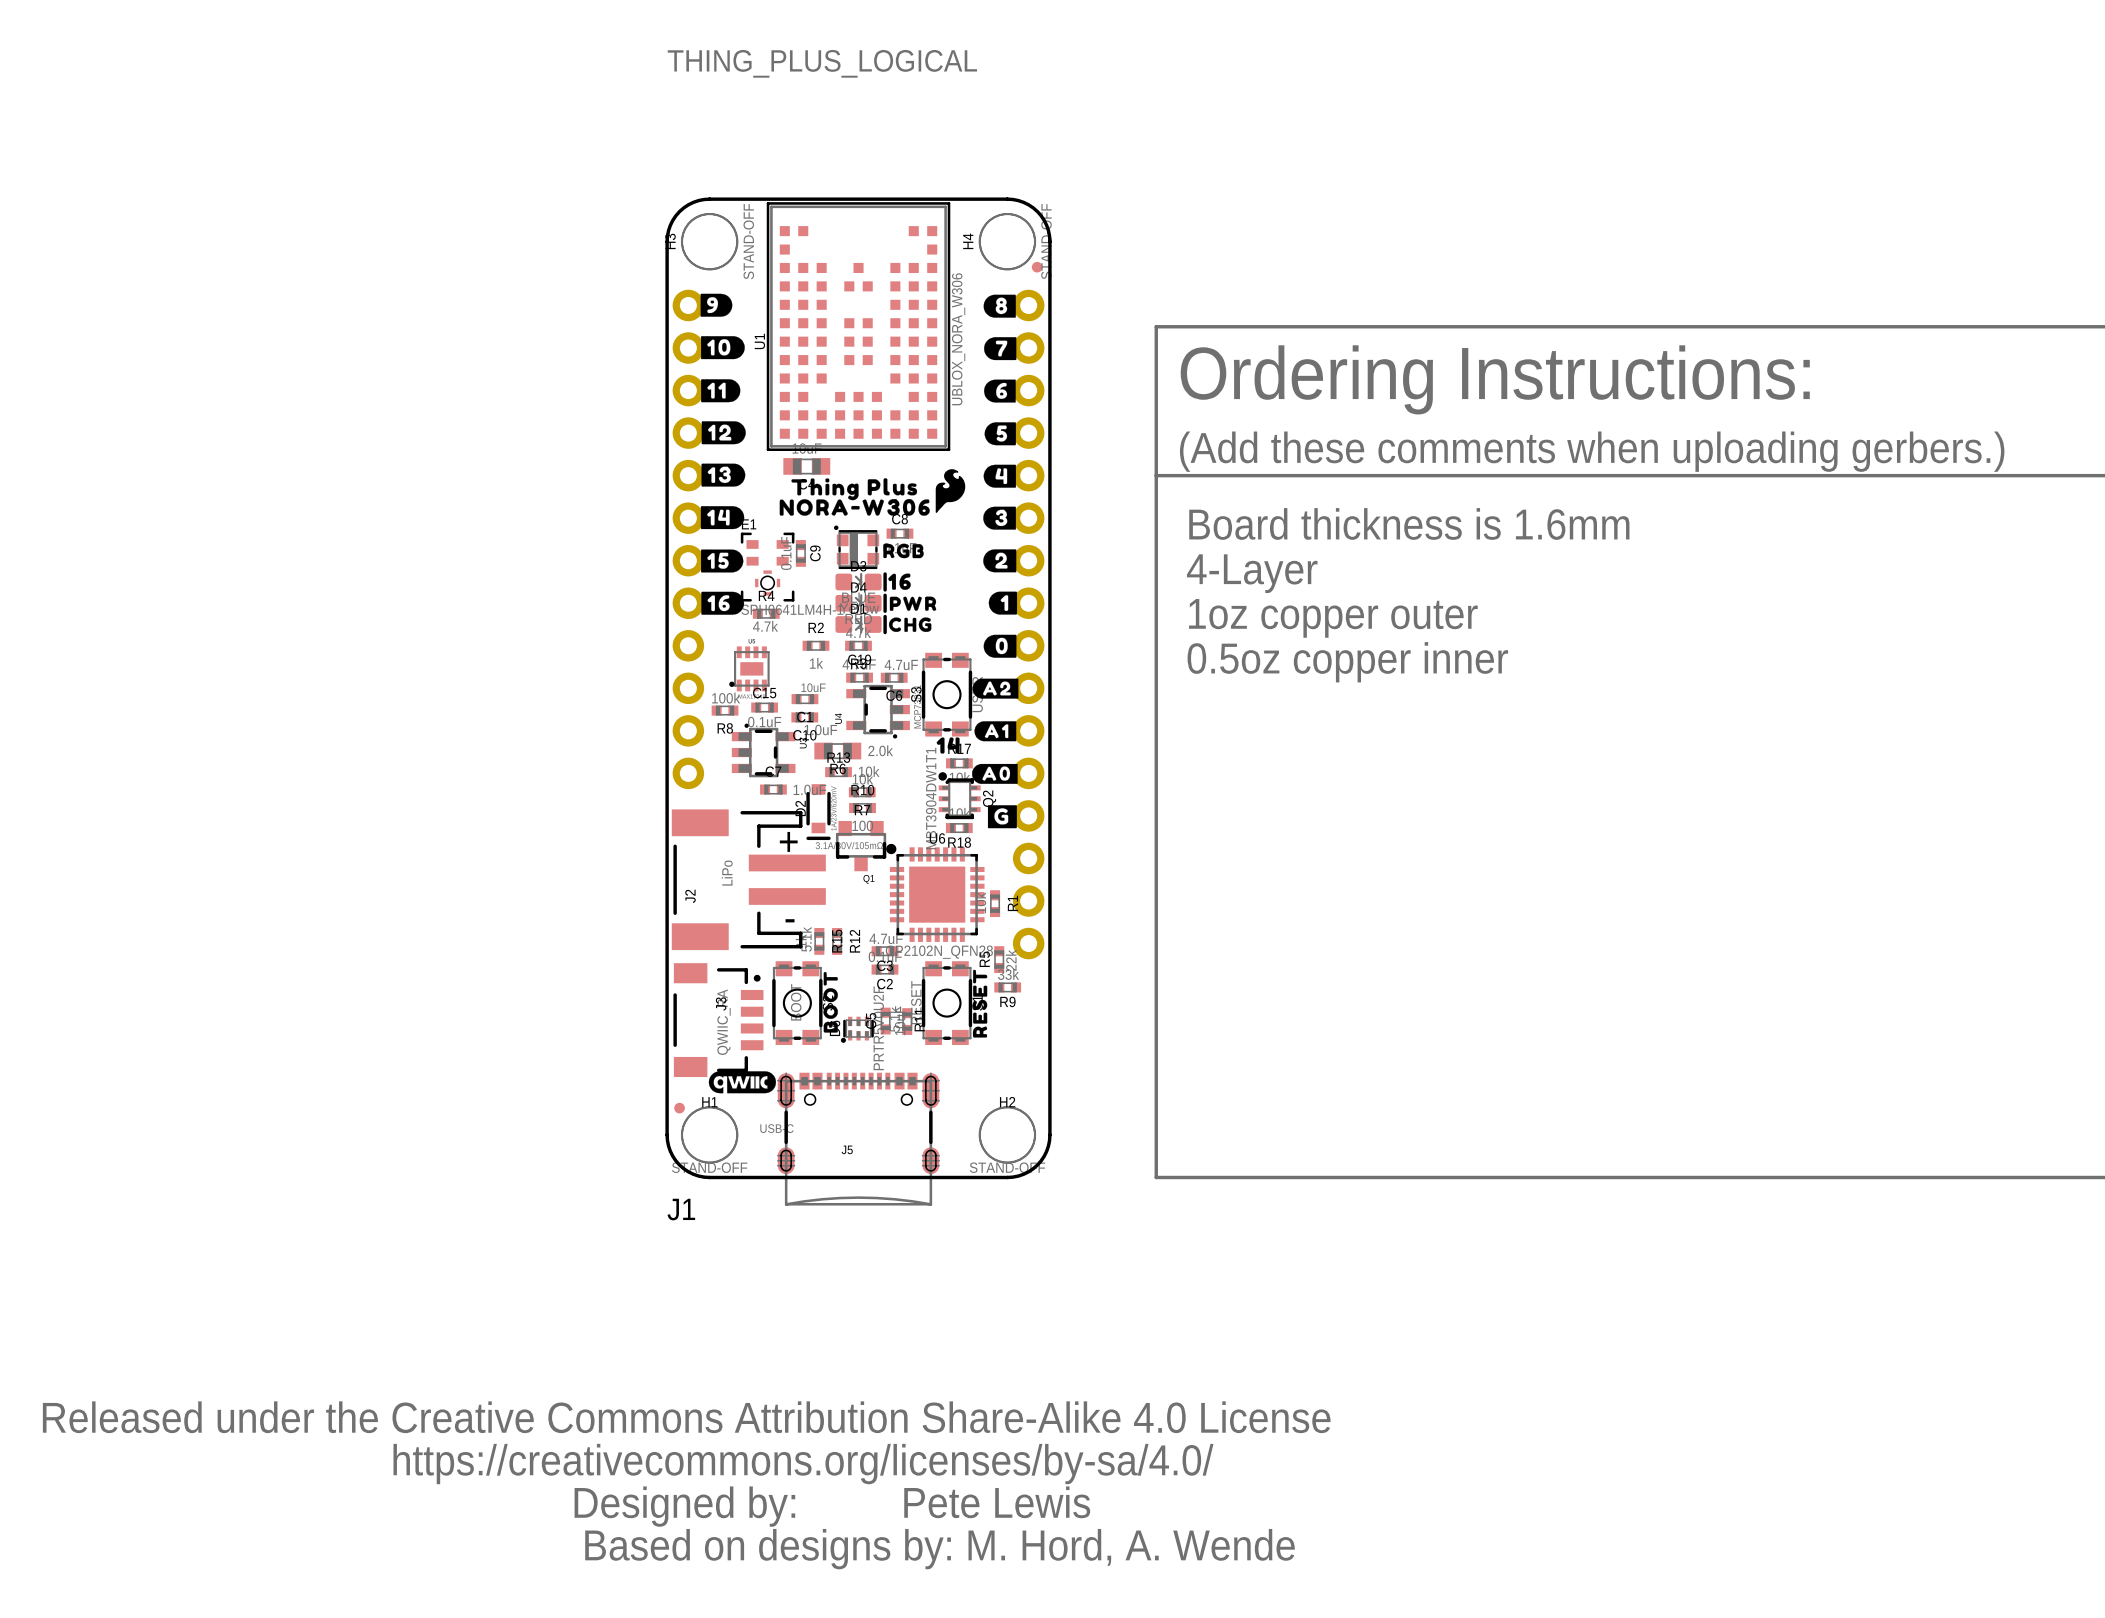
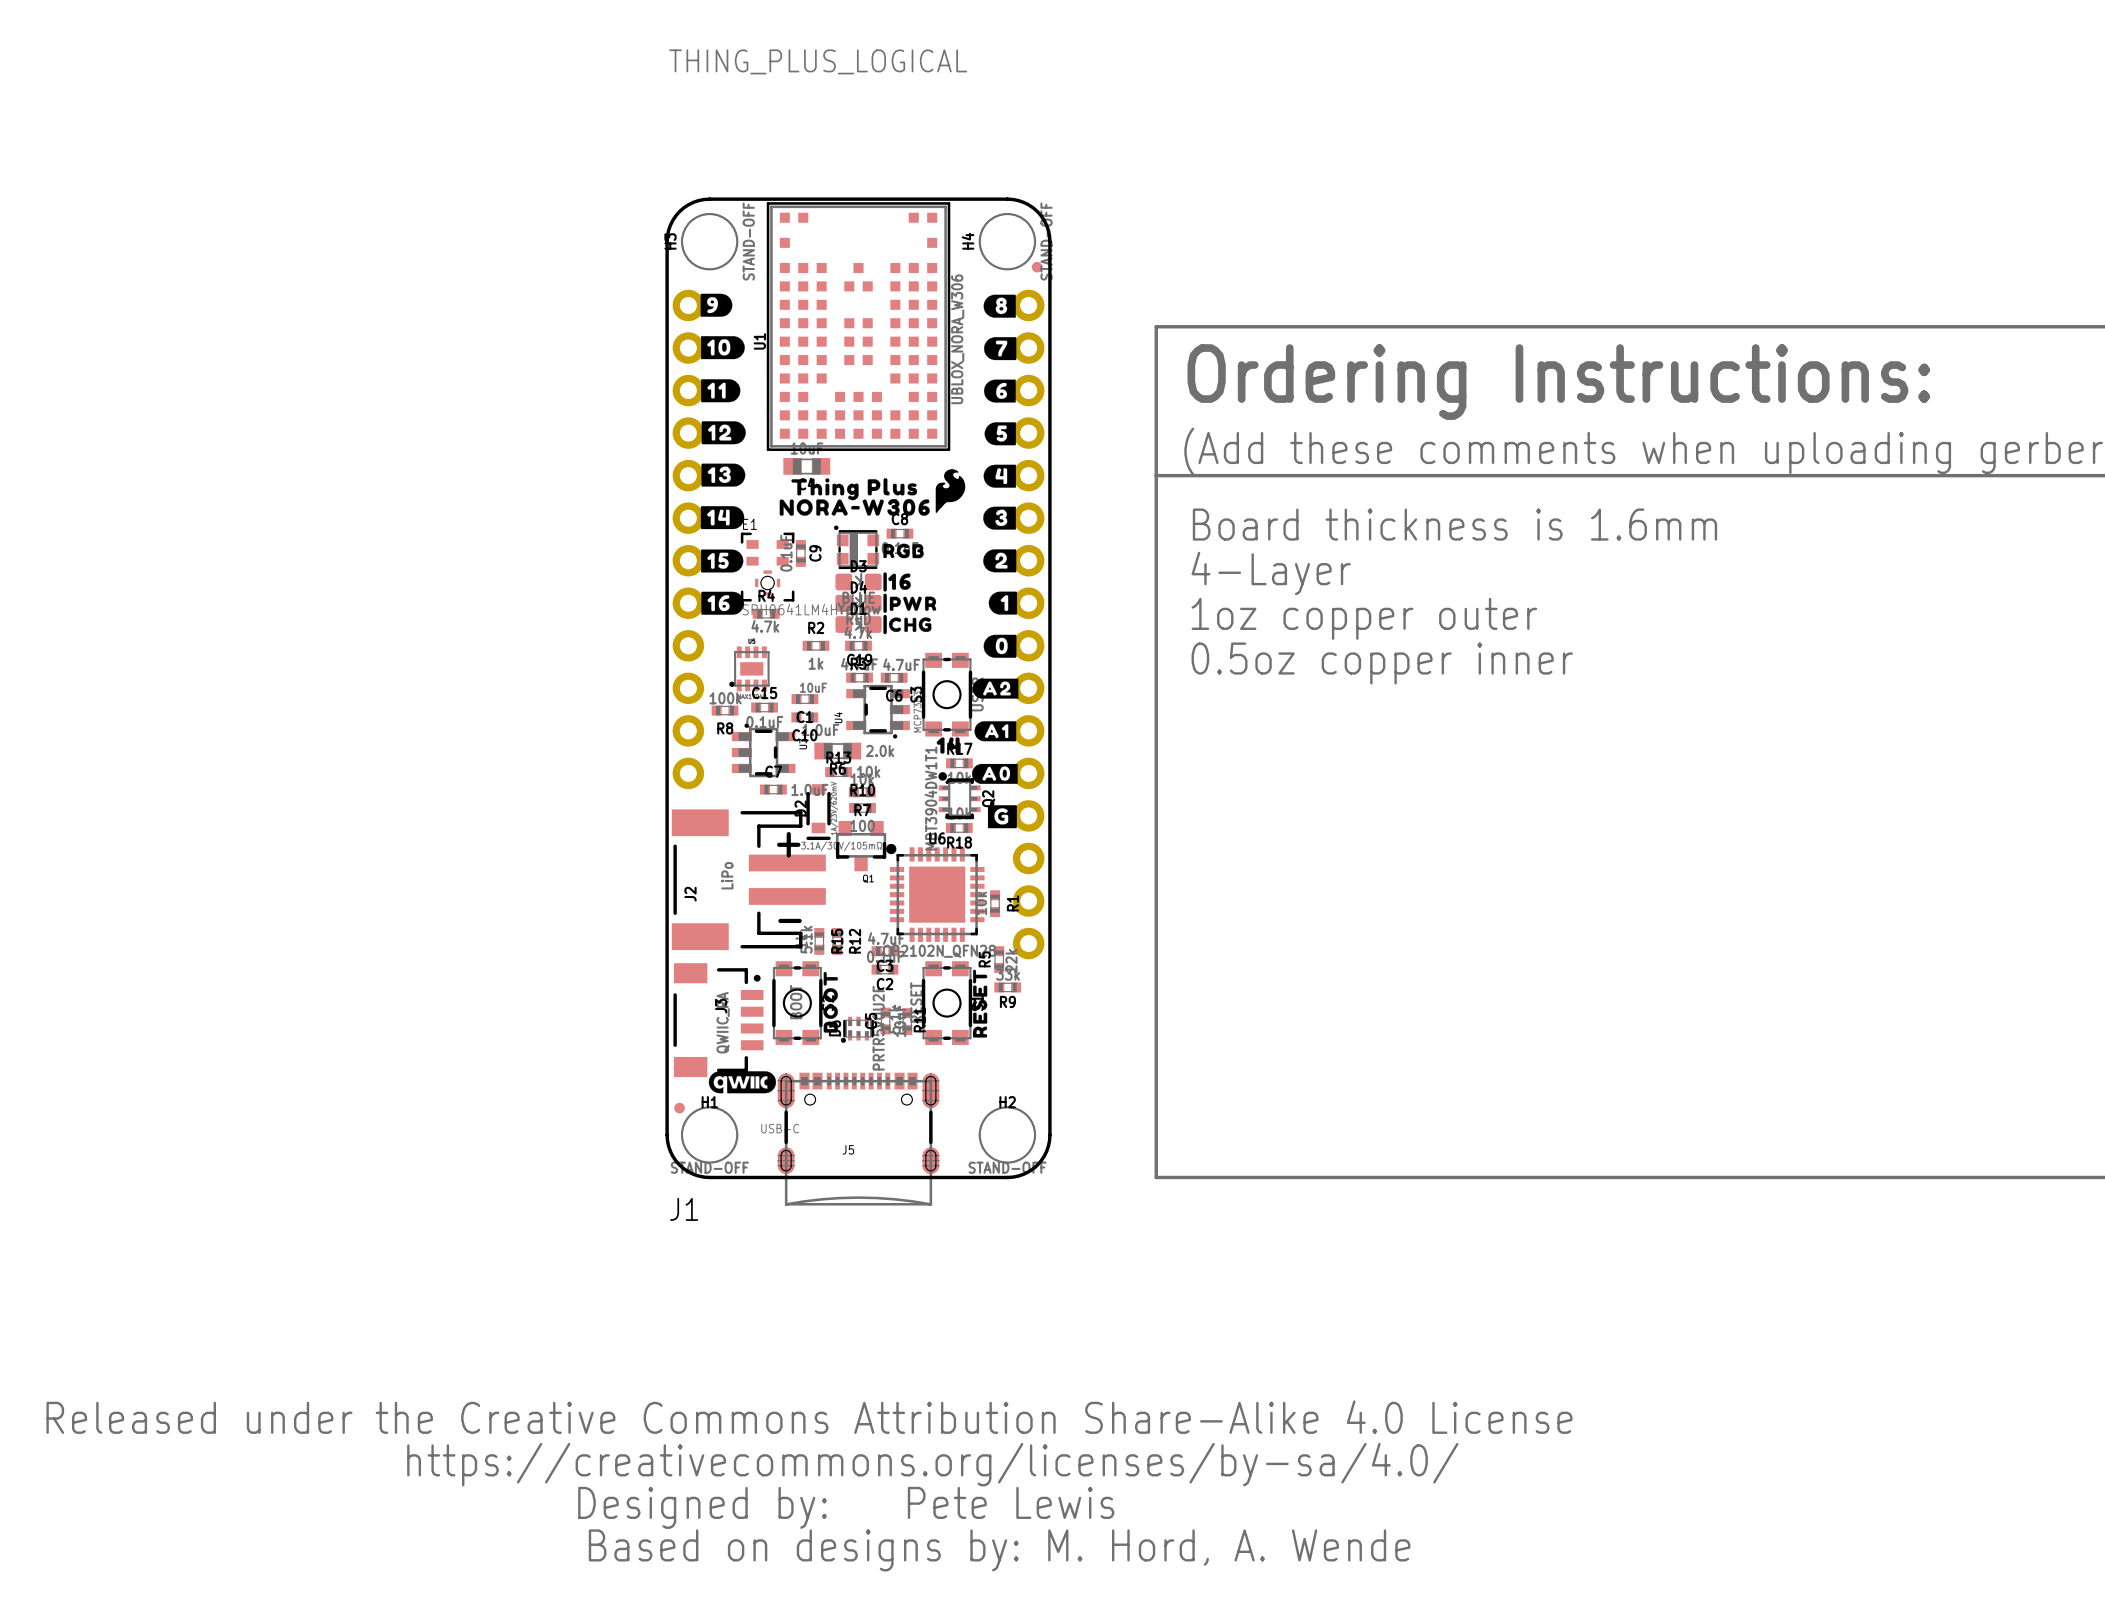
U1 footprint: [766, 202, 951, 451] -> [766, 202, 951, 451]

